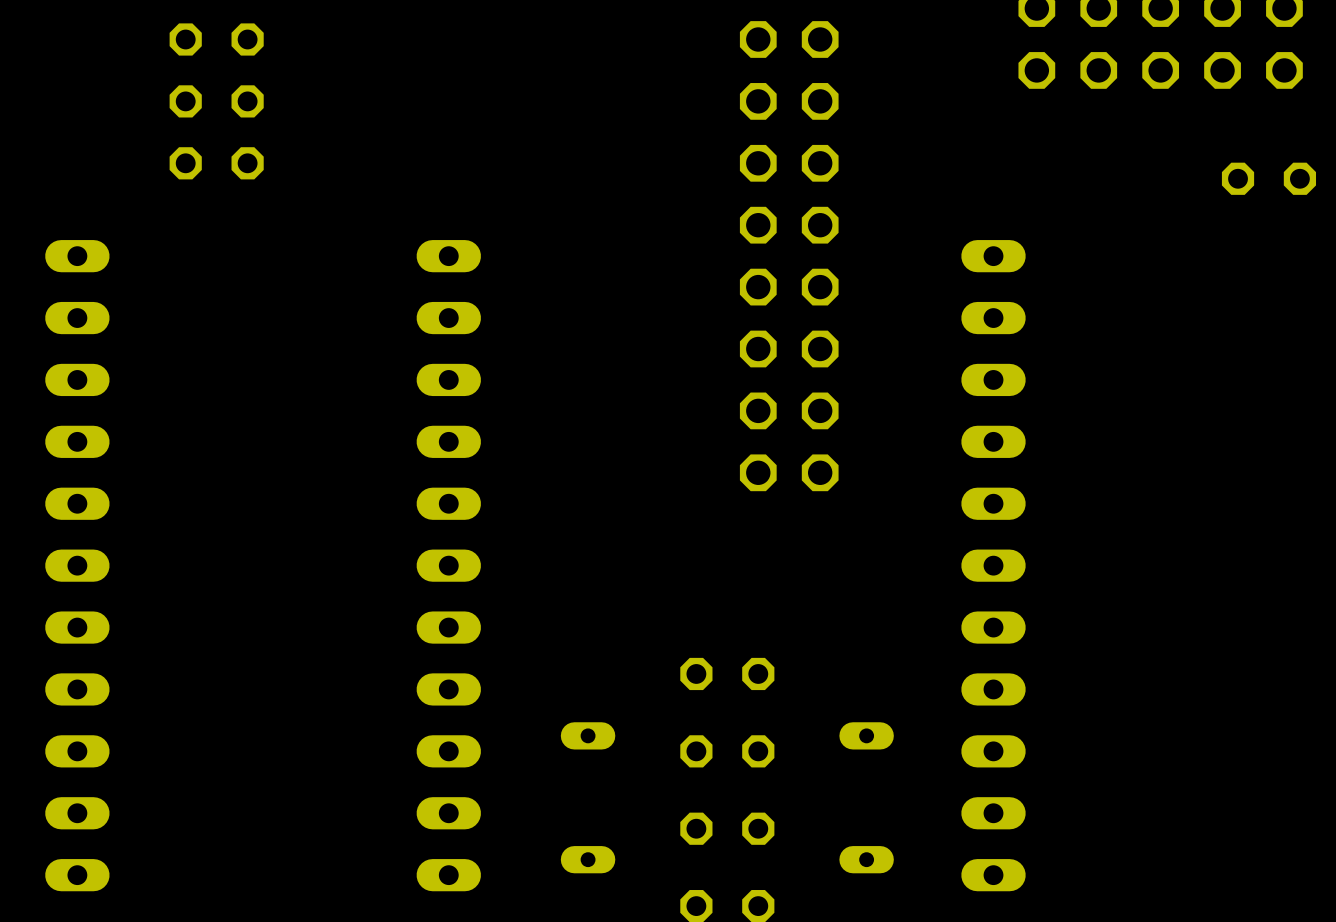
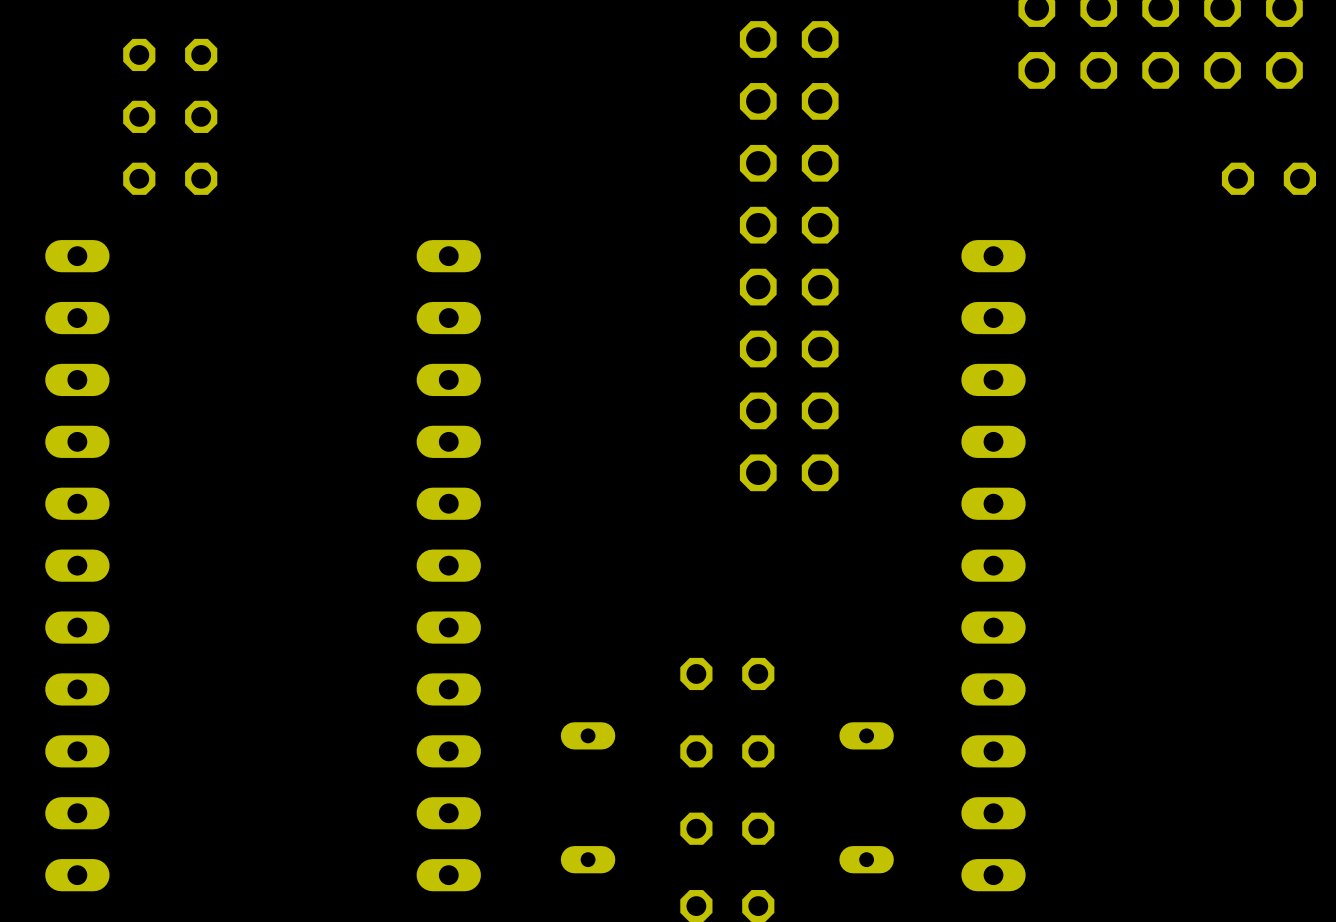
part: (216, 39) -> none
part: none -> (170, 54)
part: (216, 101) -> none
part: none -> (170, 116)
part: (216, 163) -> none
part: none -> (170, 178)

